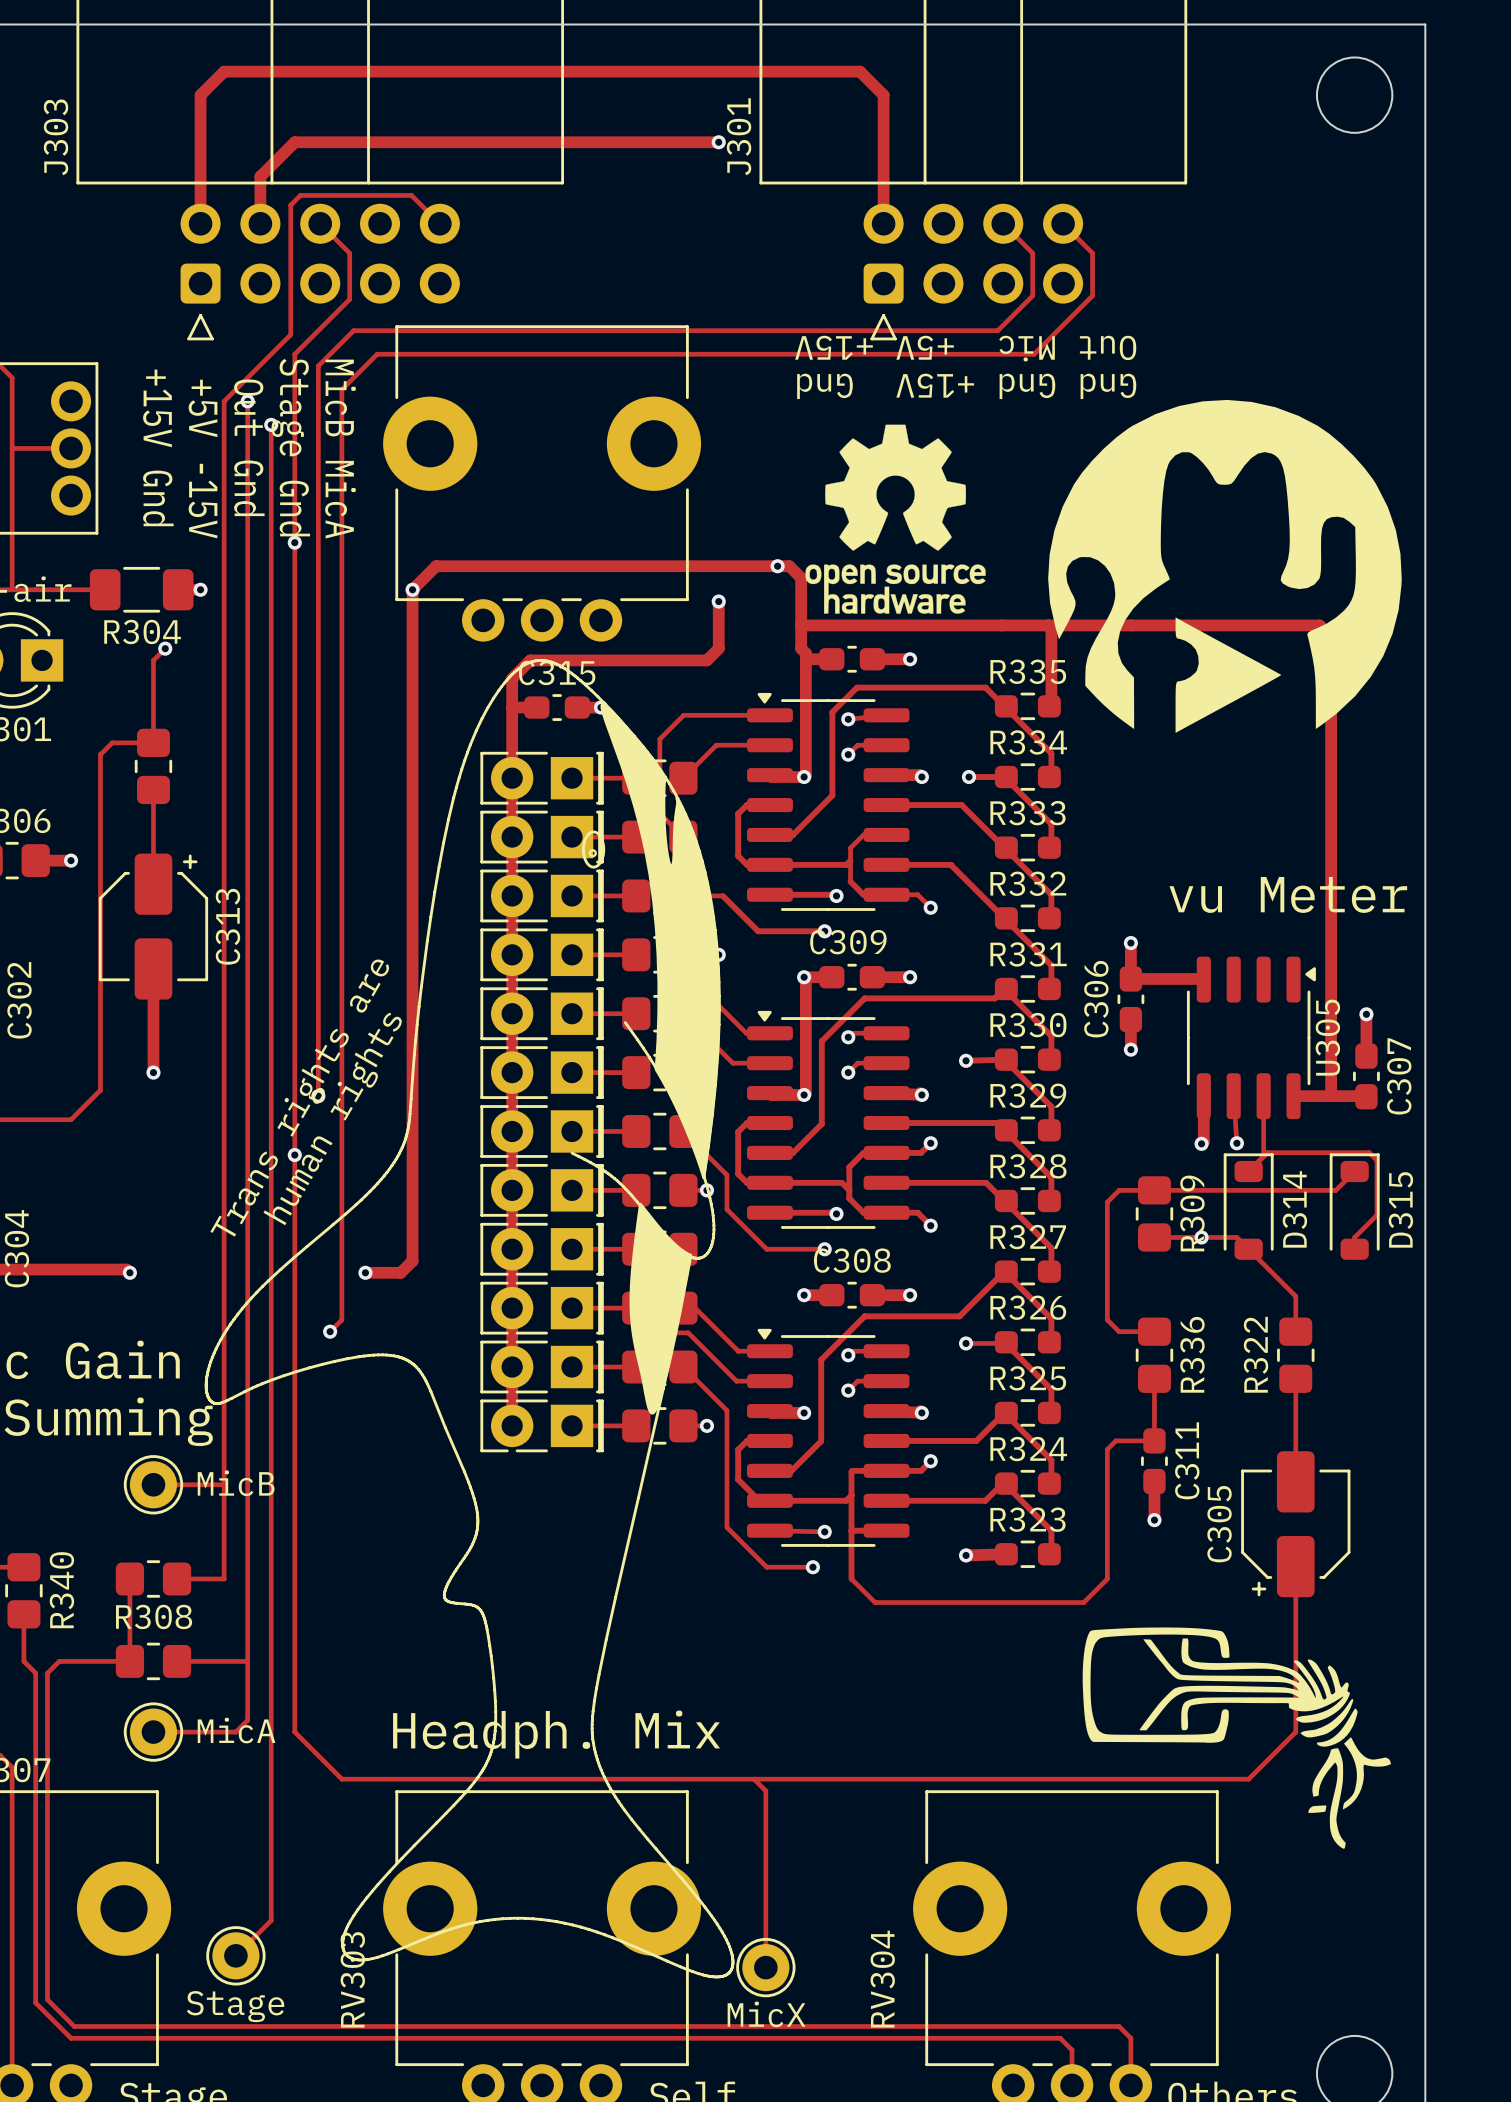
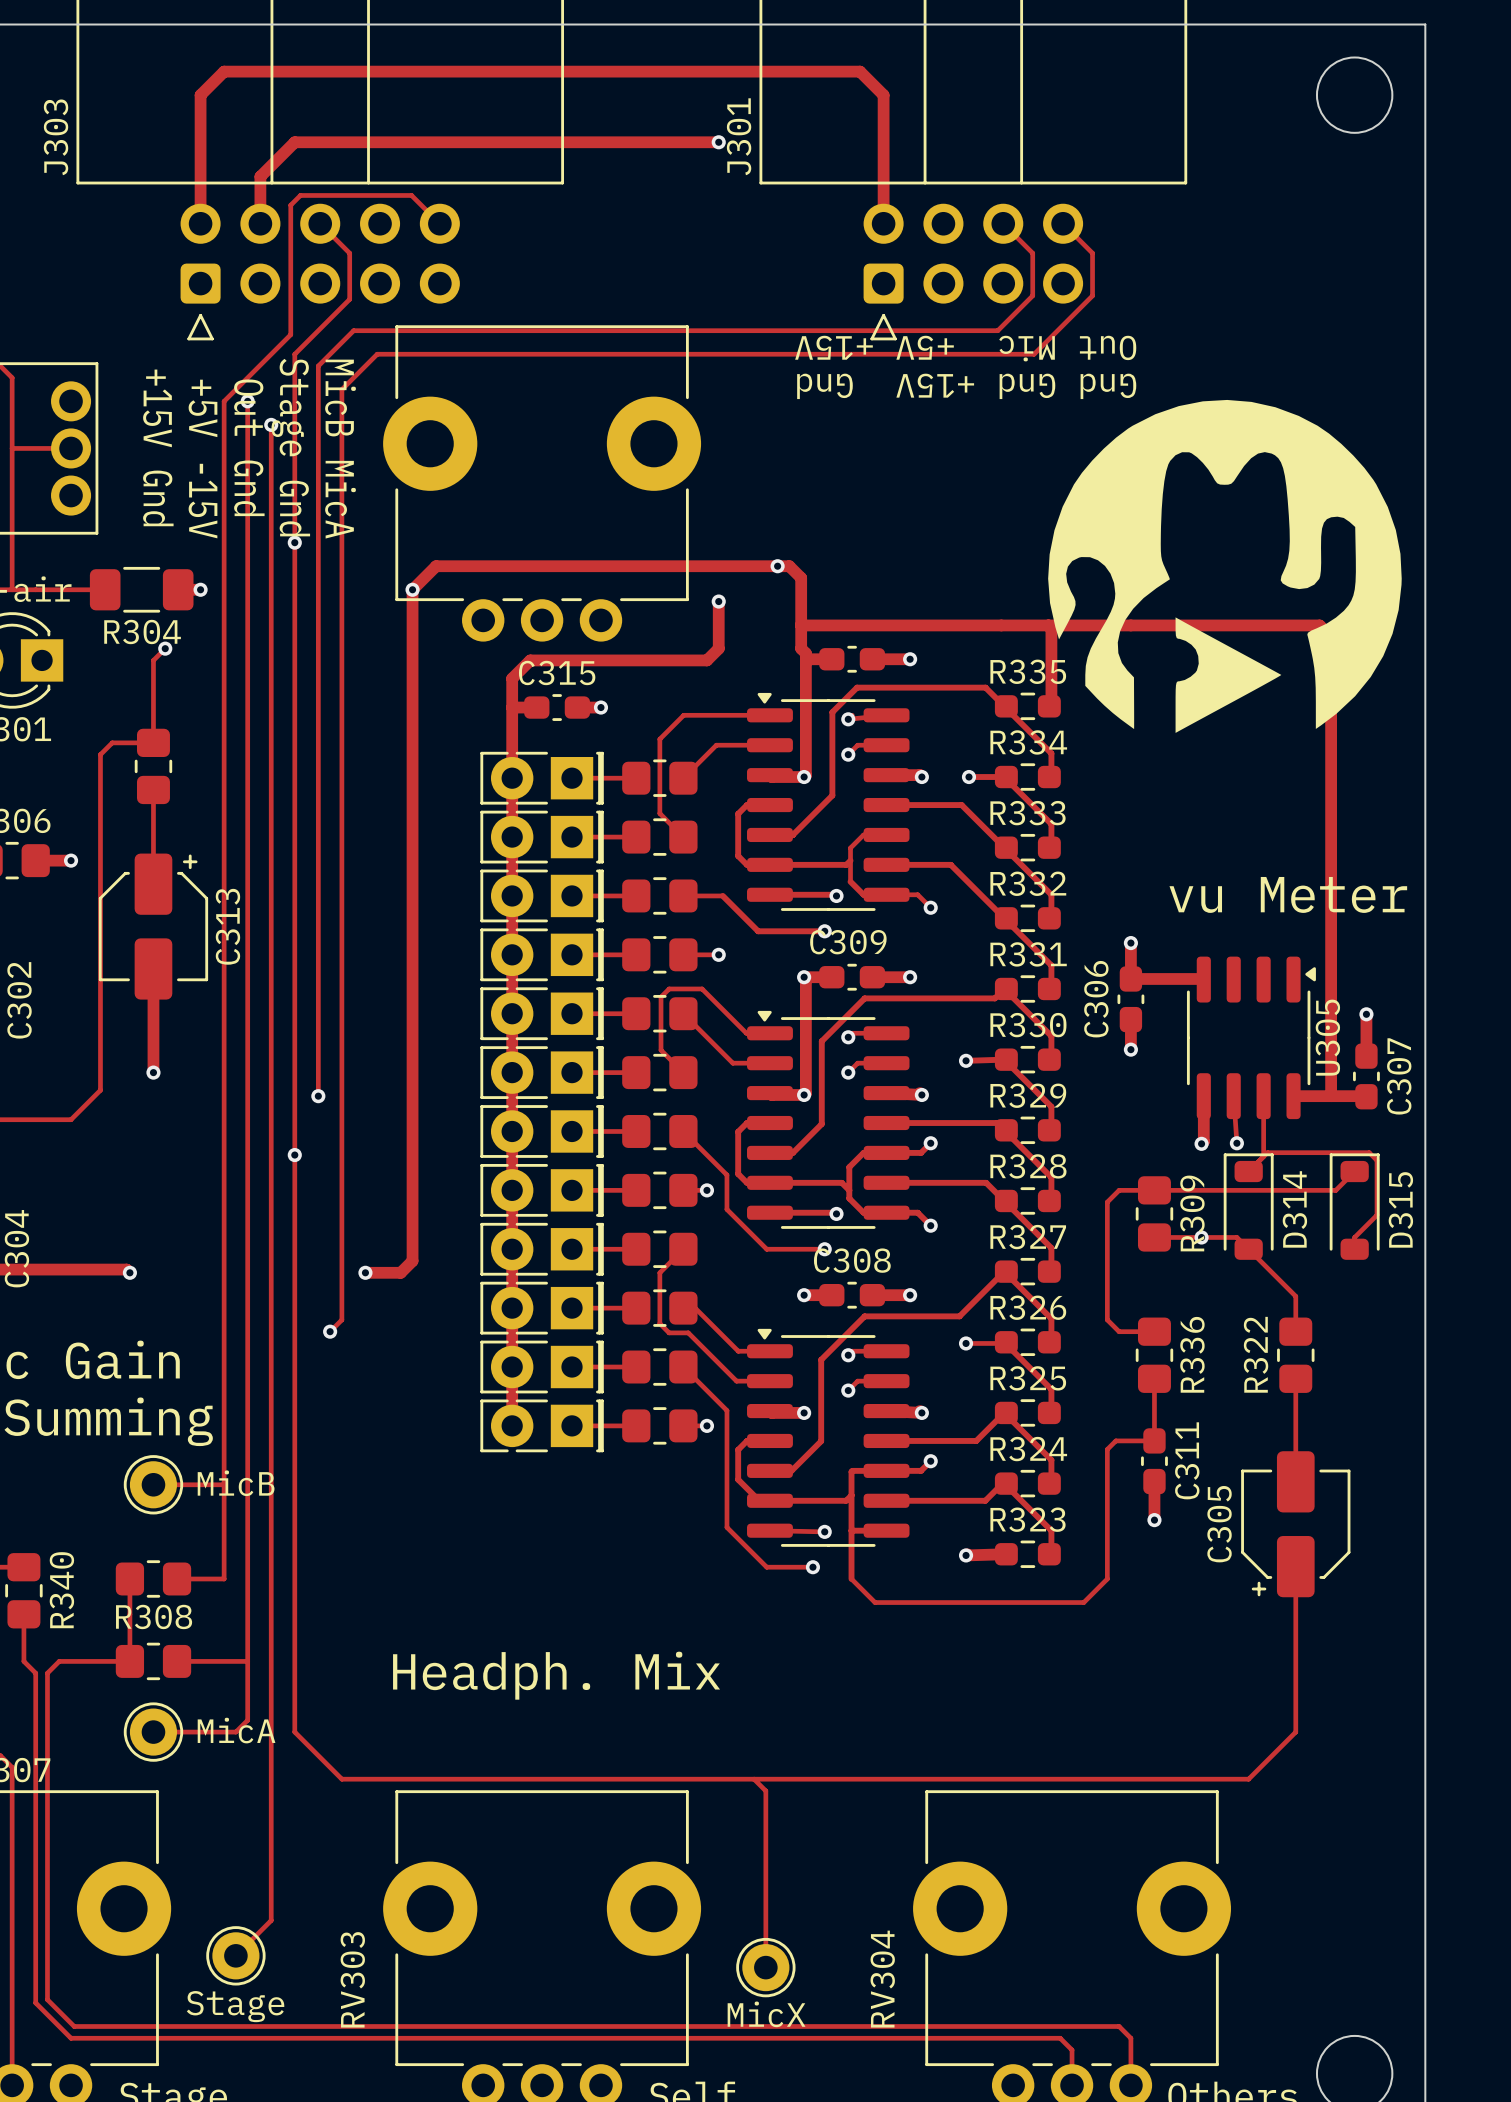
drawing: [805, 424, 986, 614] -> none
drawing: [204, 659, 735, 1979] -> none
text: Trans rights are (299, 1098) -> none
text: human rights (332, 1118) -> none
drawing: [1082, 1627, 1391, 1849] -> none
text position: Headph. Mix (556, 1734) -> Headph. Mix (556, 1675)

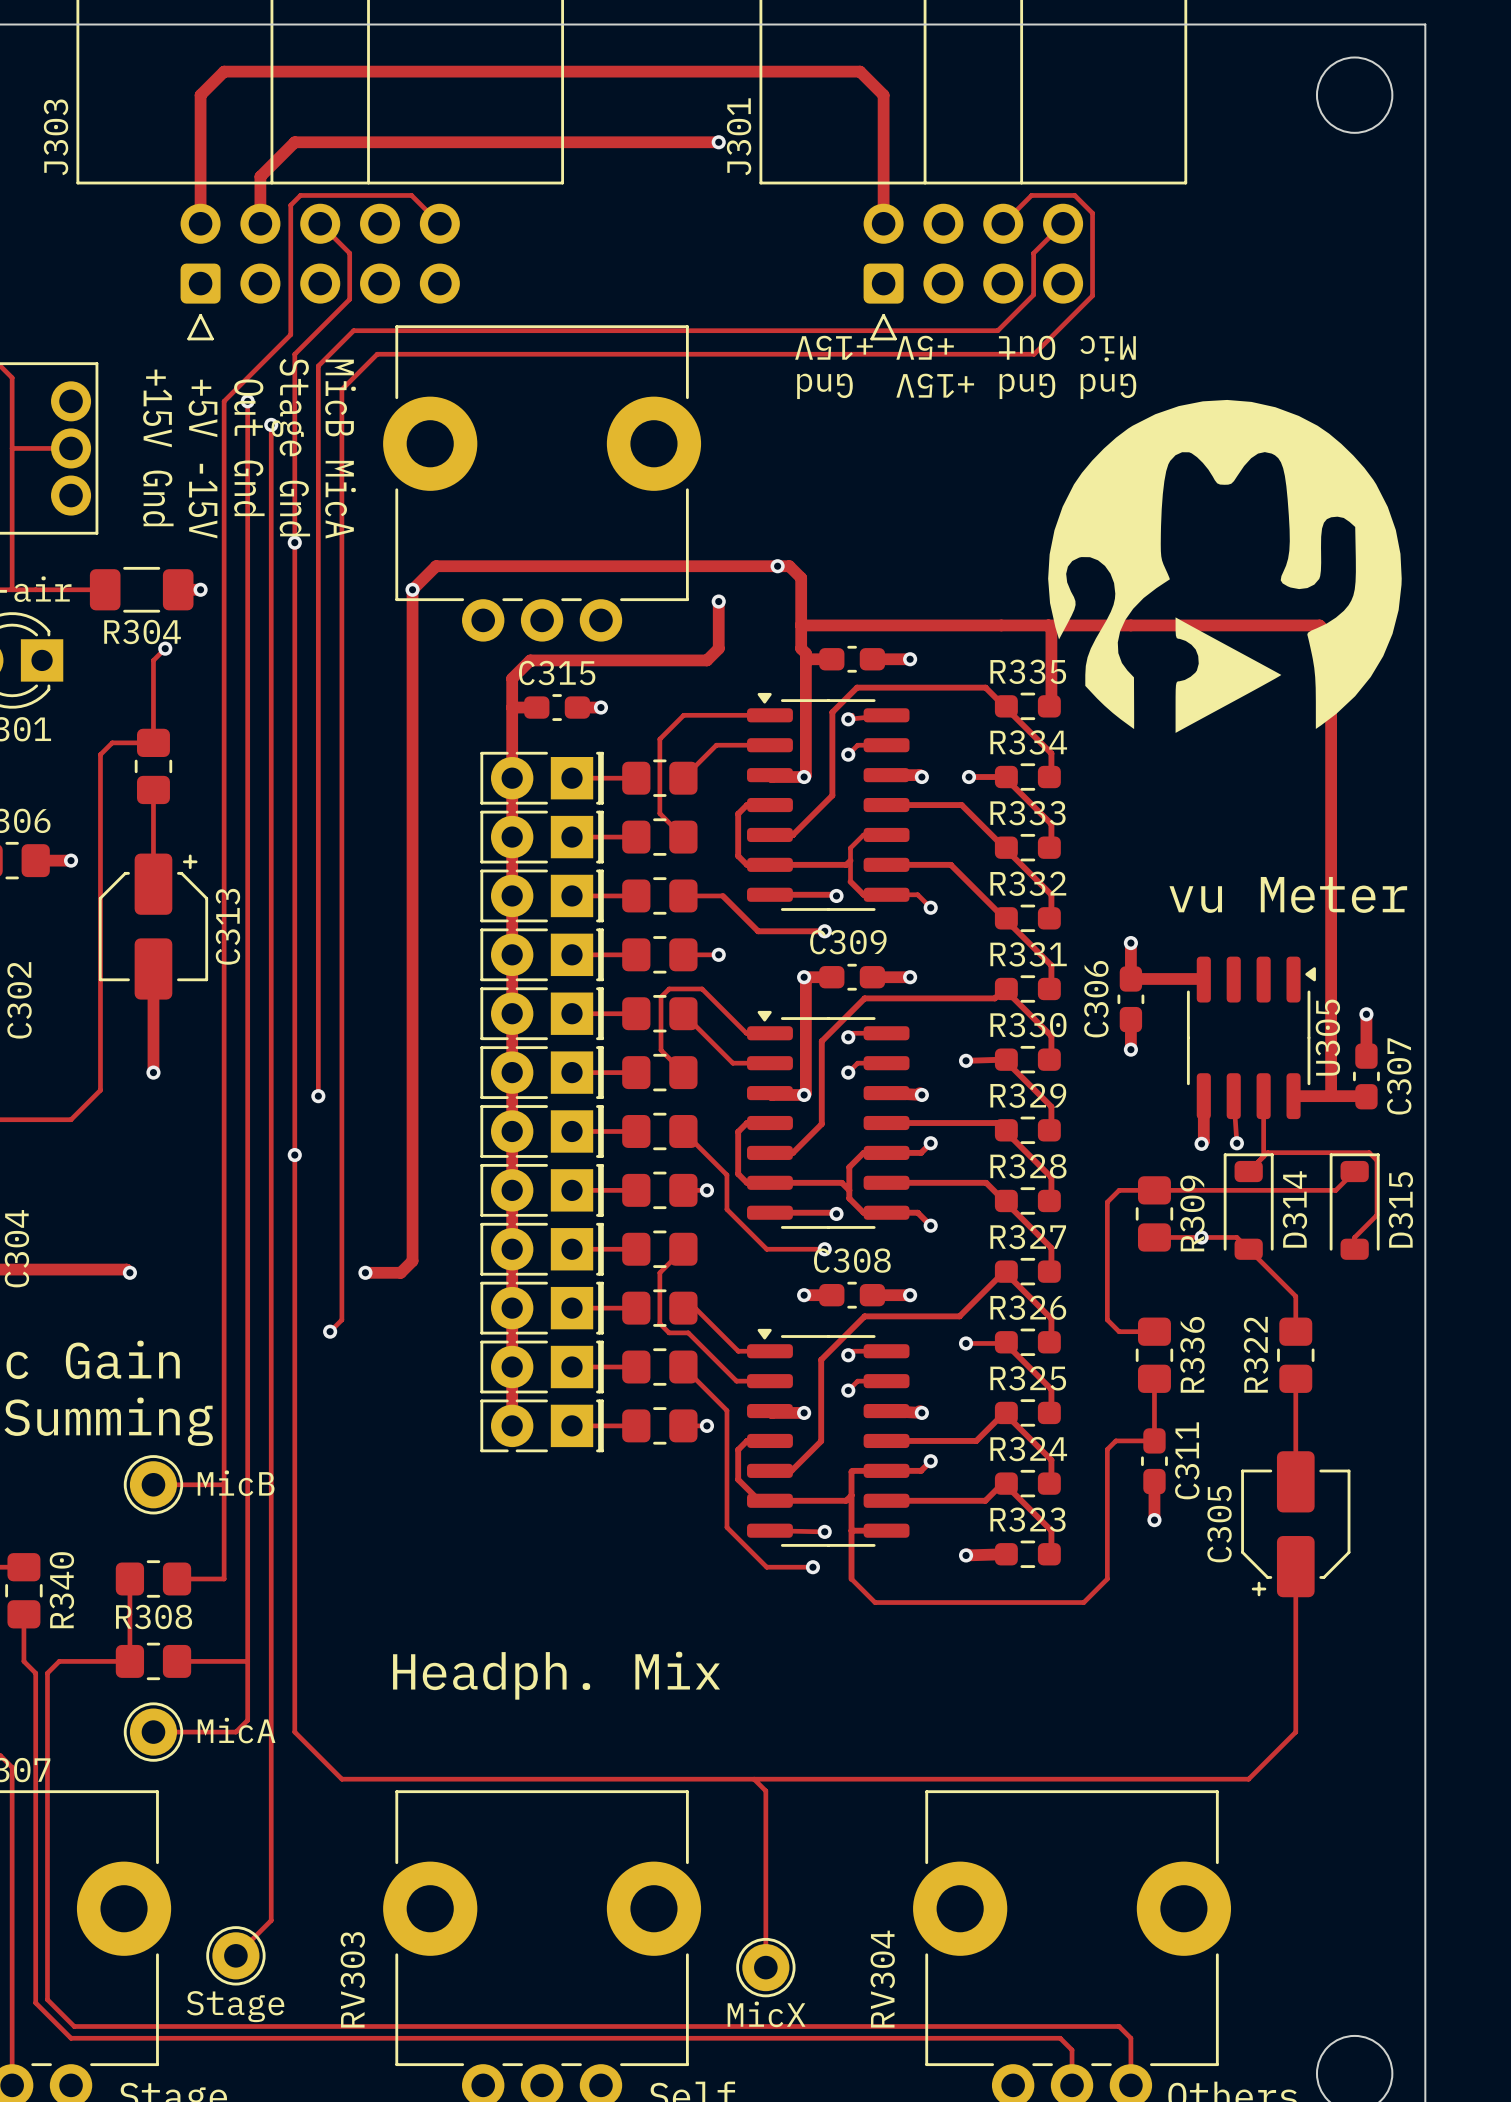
track: (1003, 223) (1032, 253) (1032, 295) -> (1063, 223) (1033, 253) (1032, 295)
track: (1063, 223) (1092, 253) -> (1003, 223) (1031, 195) (1074, 195) (1092, 213) (1092, 253)
text: Out Mic +5V +15V (965, 348) -> Mic Out +5V +15V (965, 348)

